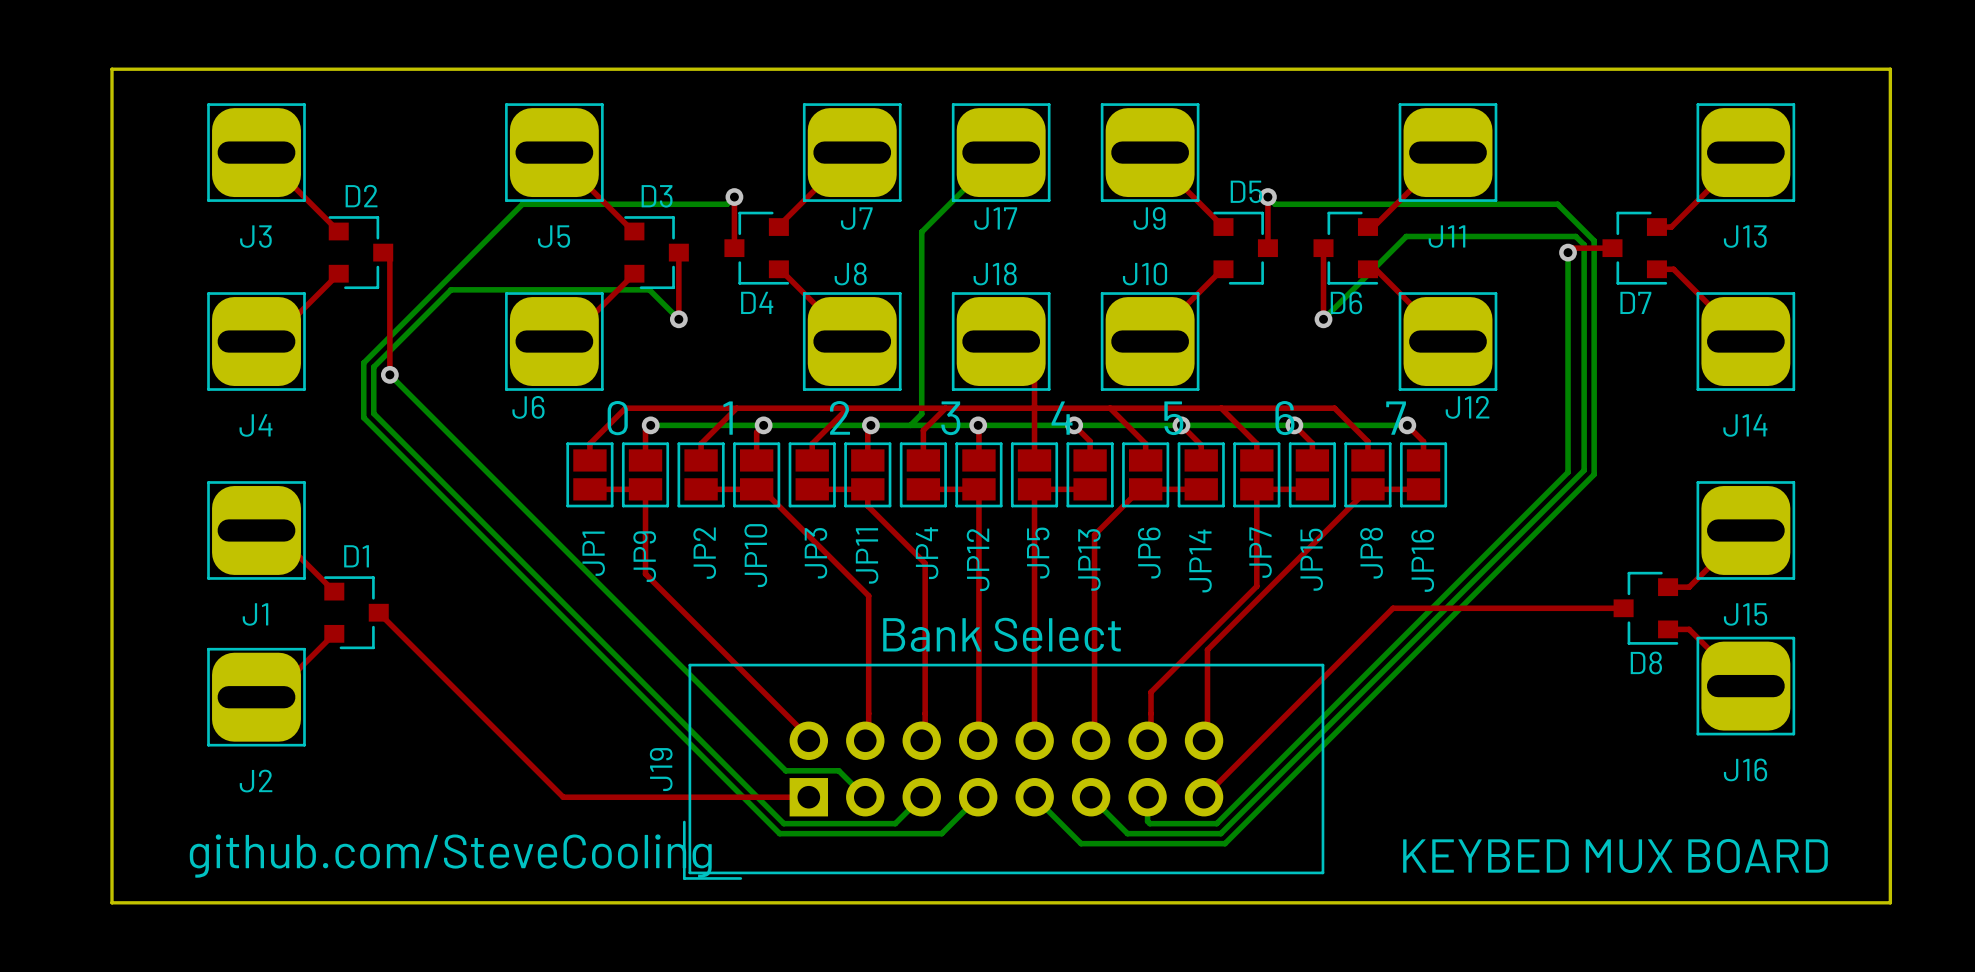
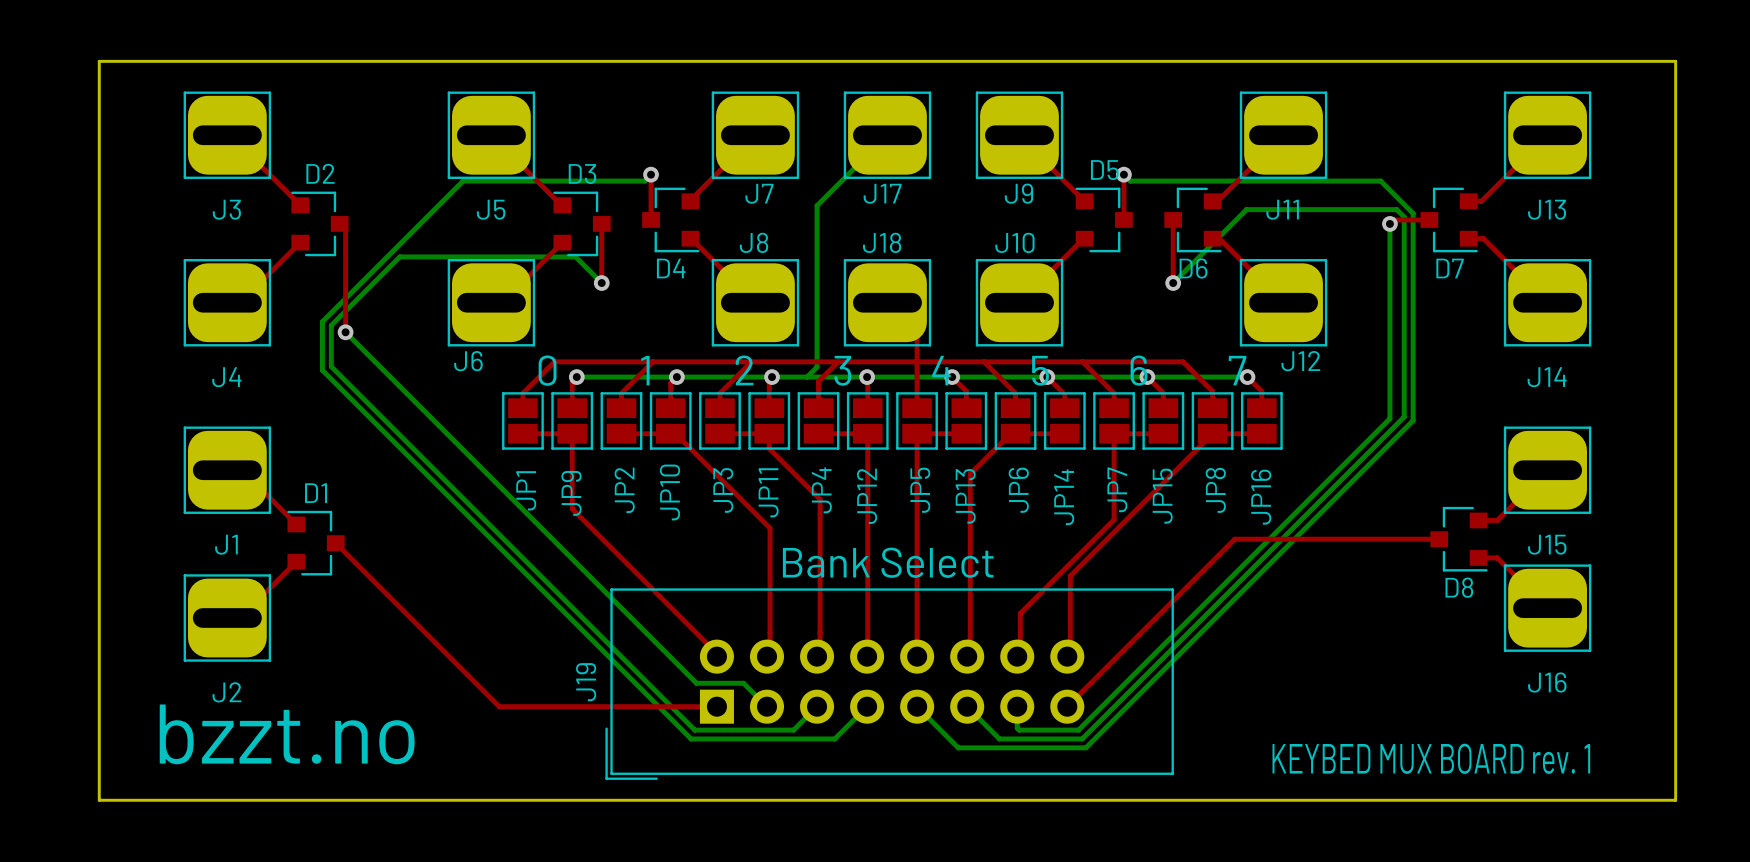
text: none -> bzzt.no (287, 734)
text: github.com/SteveCooling (450, 856) -> none
text: KEYBED MUX BOARD (1615, 856) -> KEYBED MUX BOARD rev. 1 (1431, 758)

